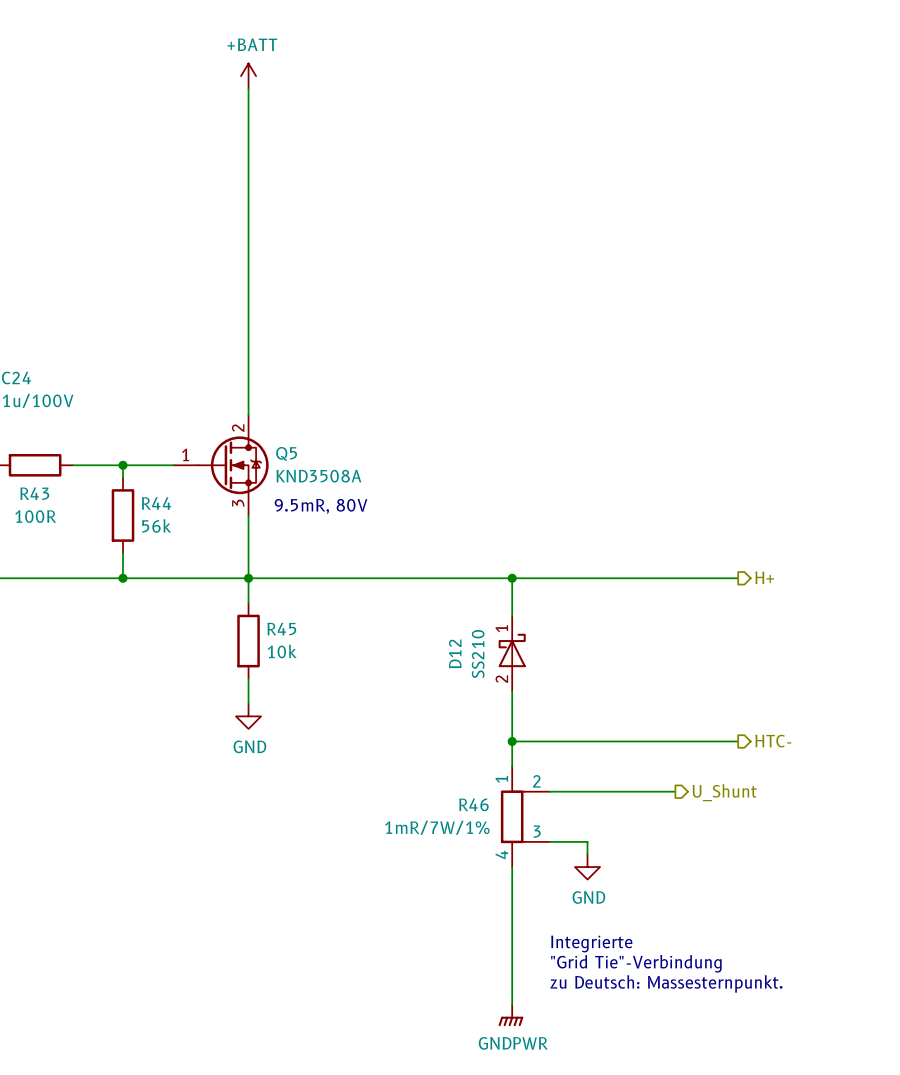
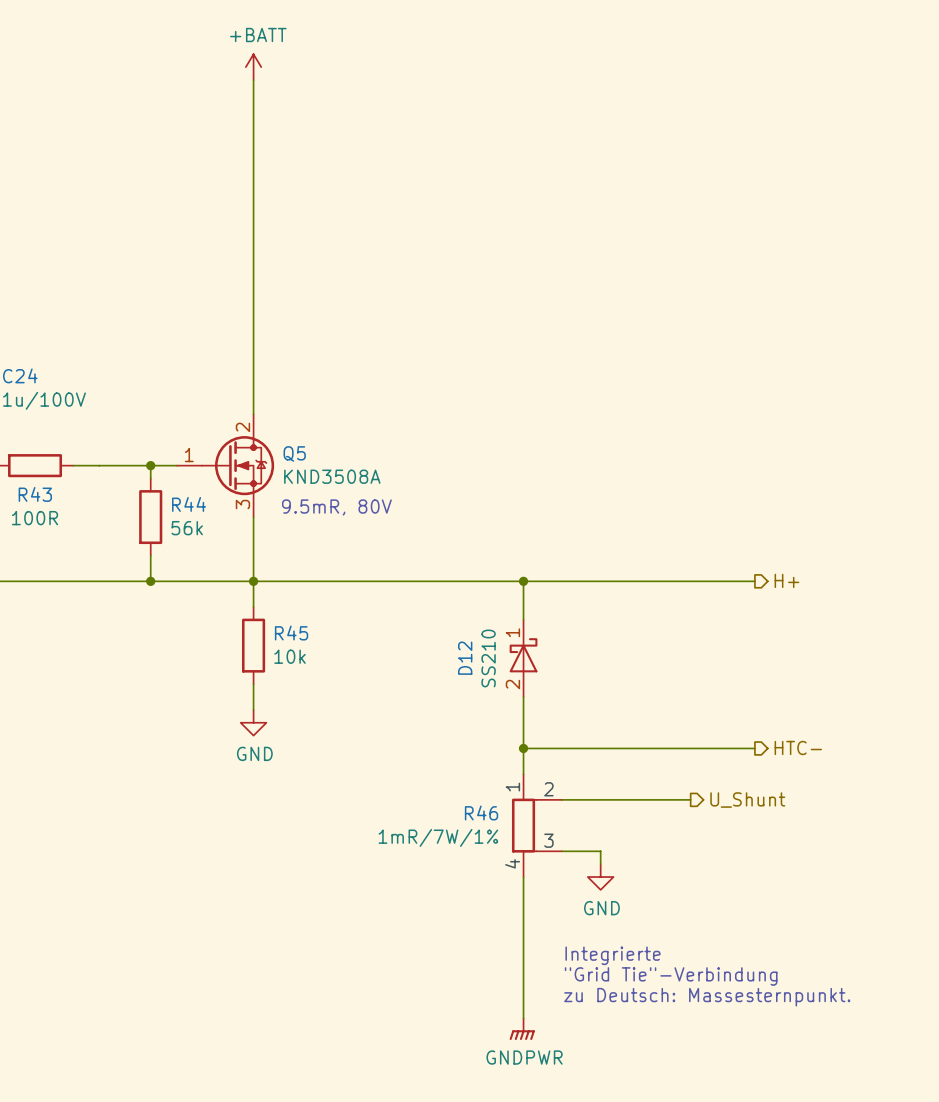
wire: (122, 465) (122, 477) -> (150, 465) (150, 478)
junction position: (122, 465) -> (150, 465)
R44 position: (122, 515) -> (150, 517)
wire: (122, 553) (122, 578) -> (150, 555) (150, 581)
junction position: (122, 578) -> (150, 581)

